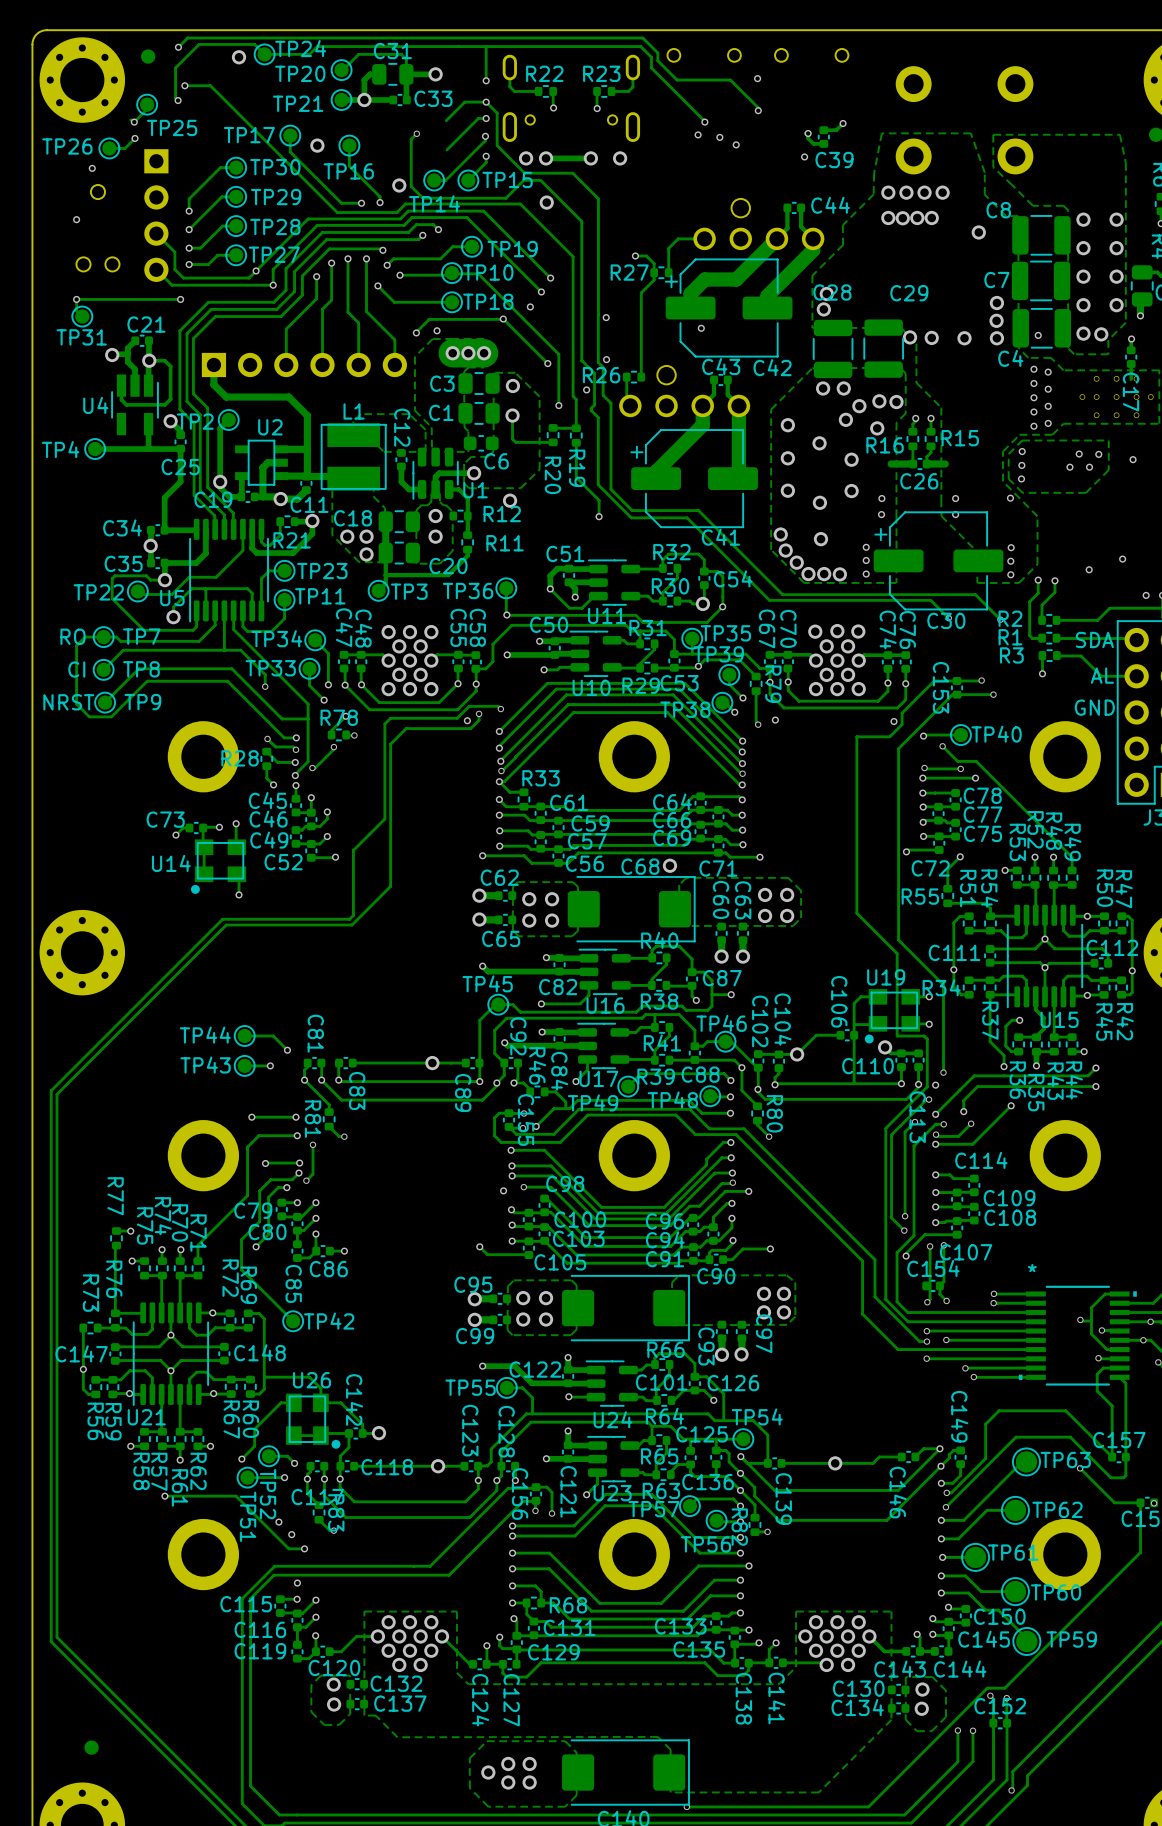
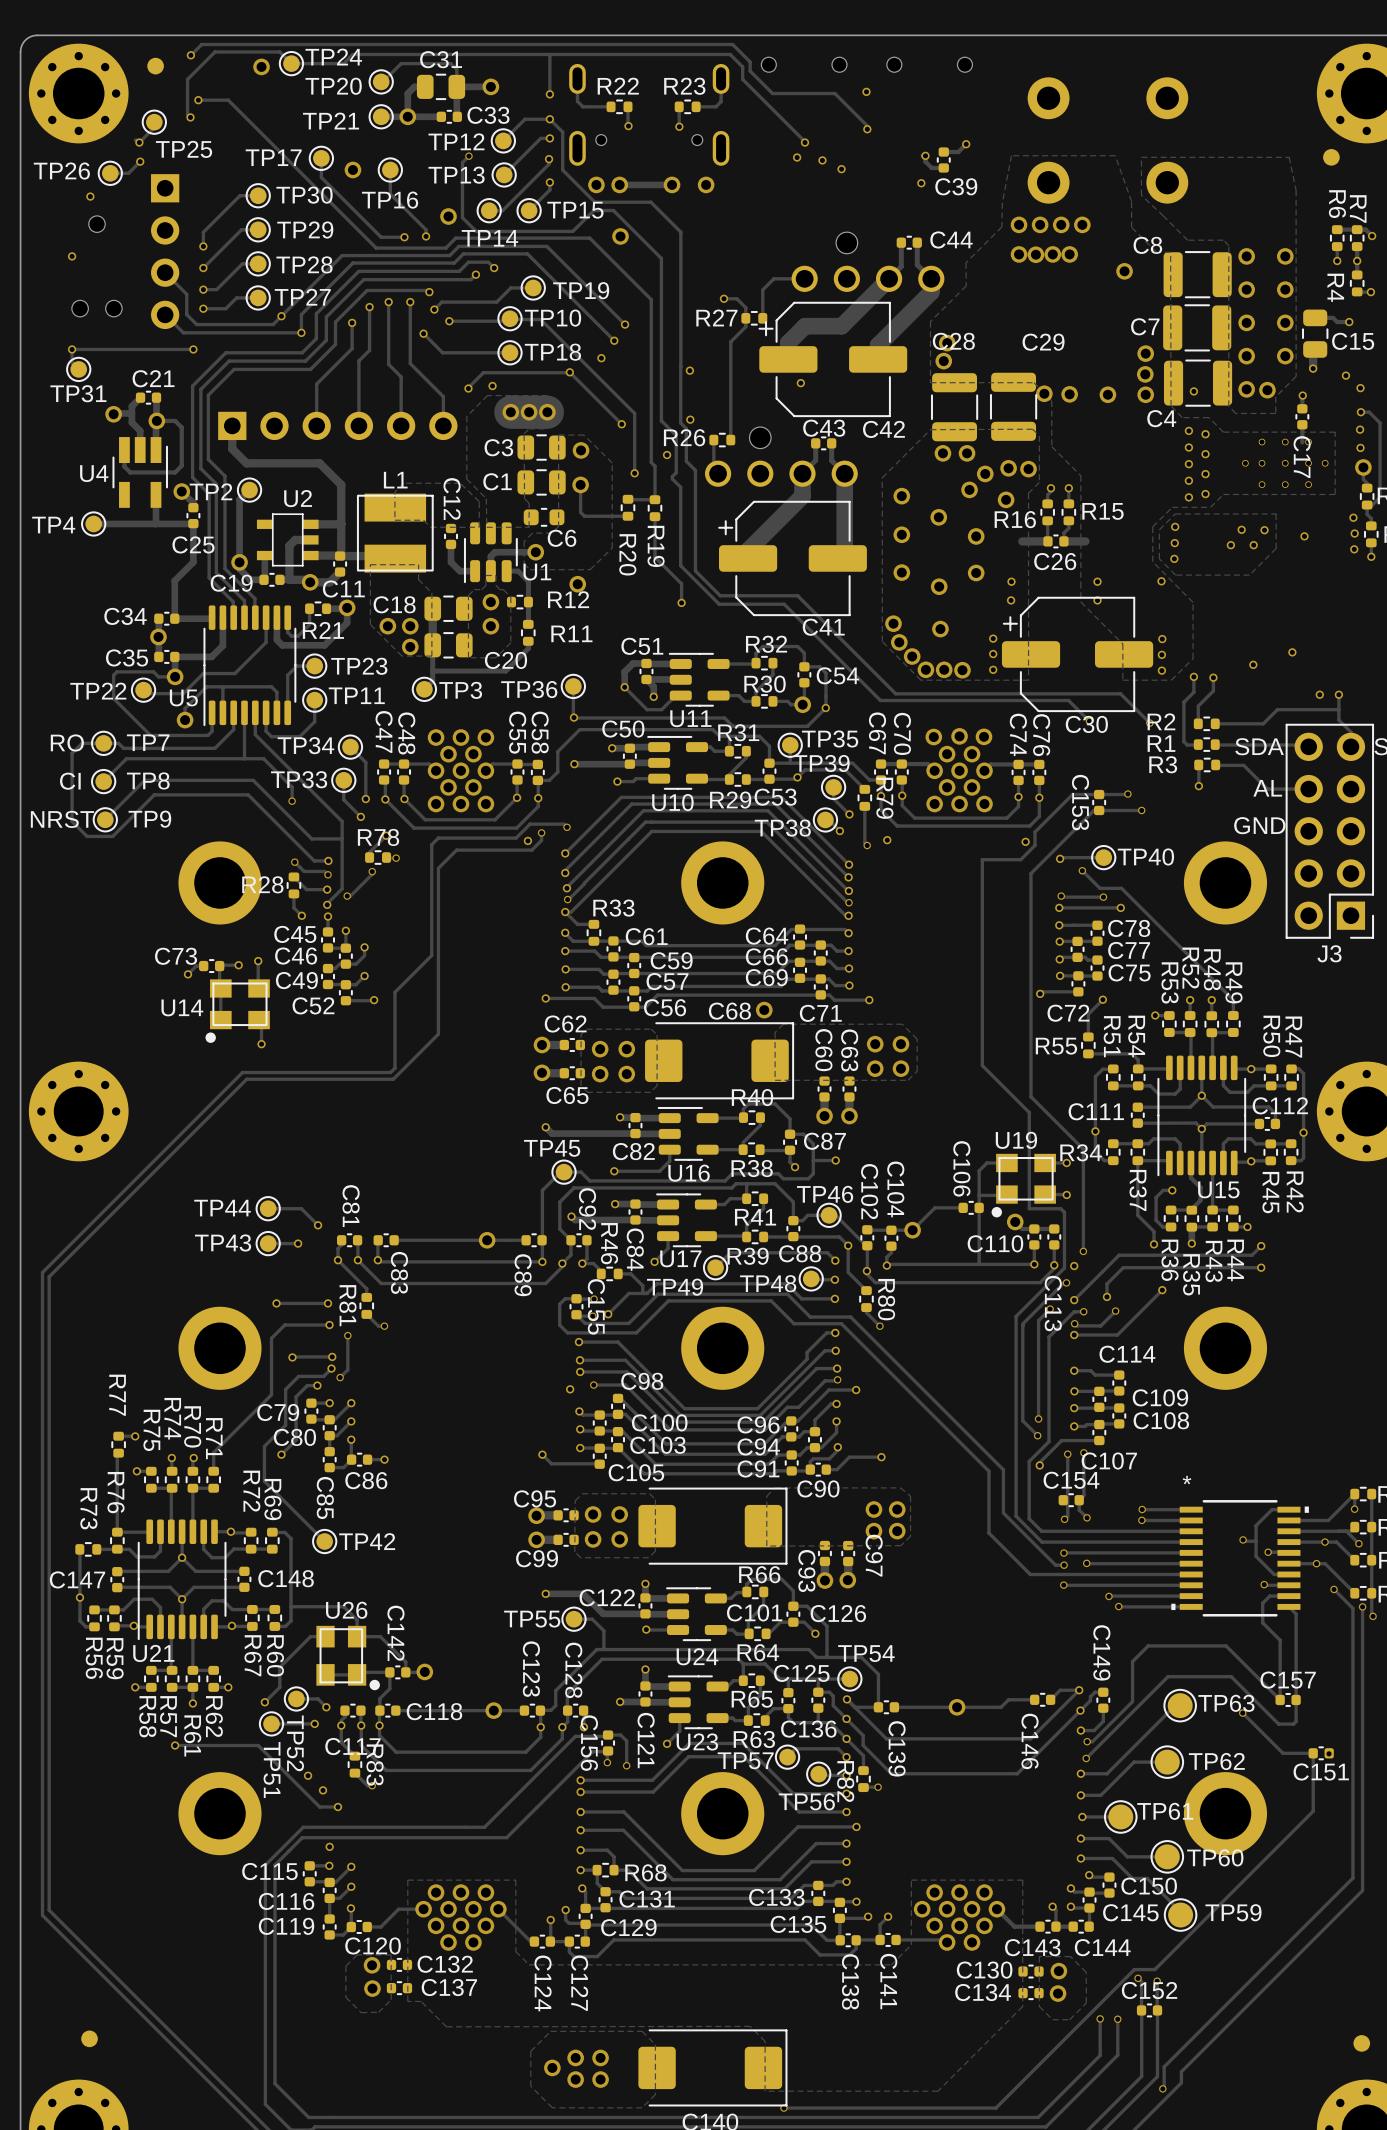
TP12: none -> (503, 140)
TP13: none -> (504, 174)

